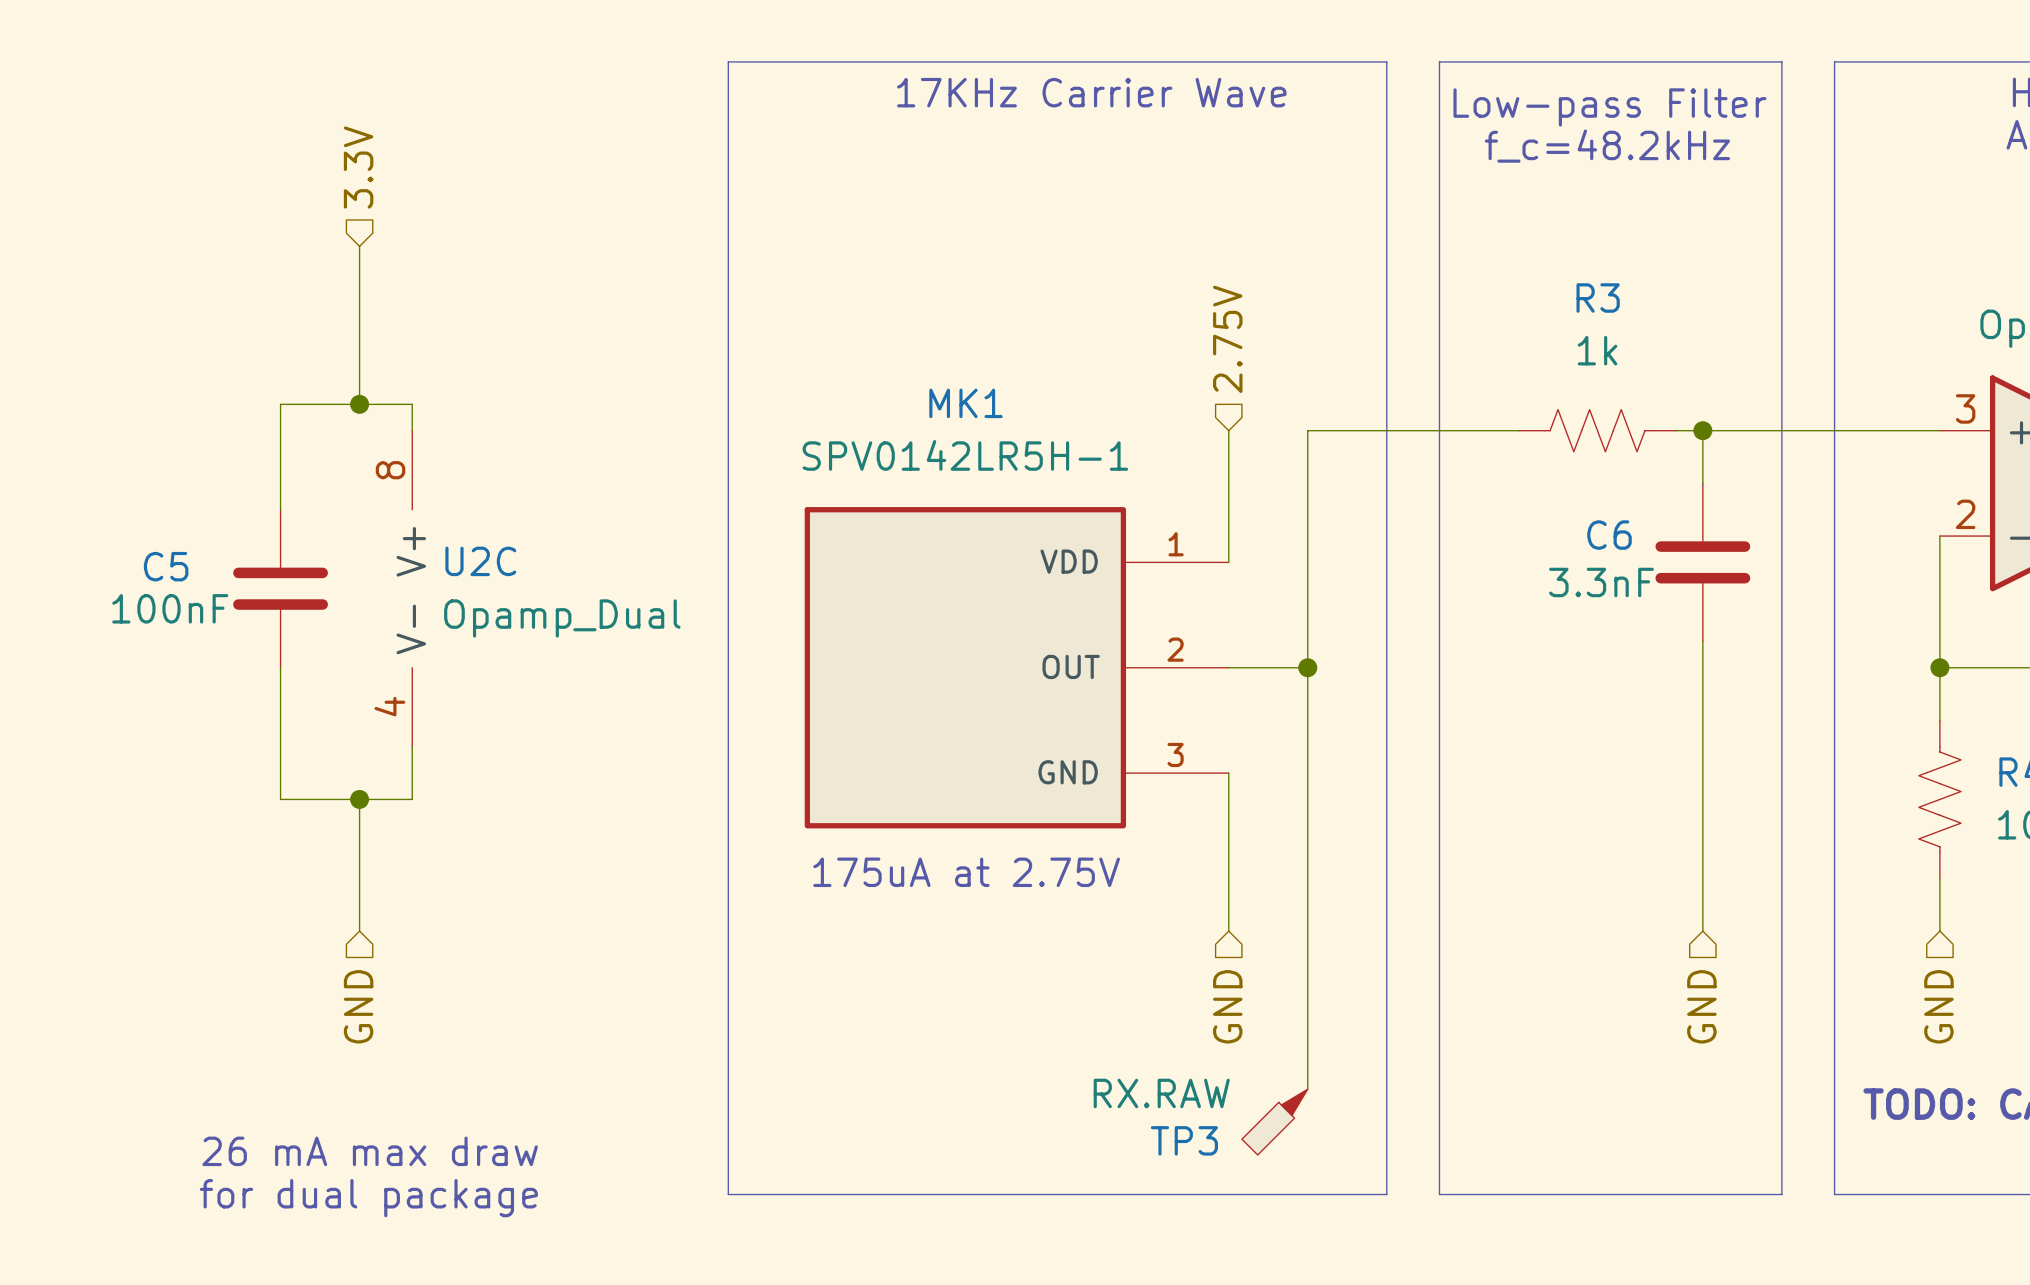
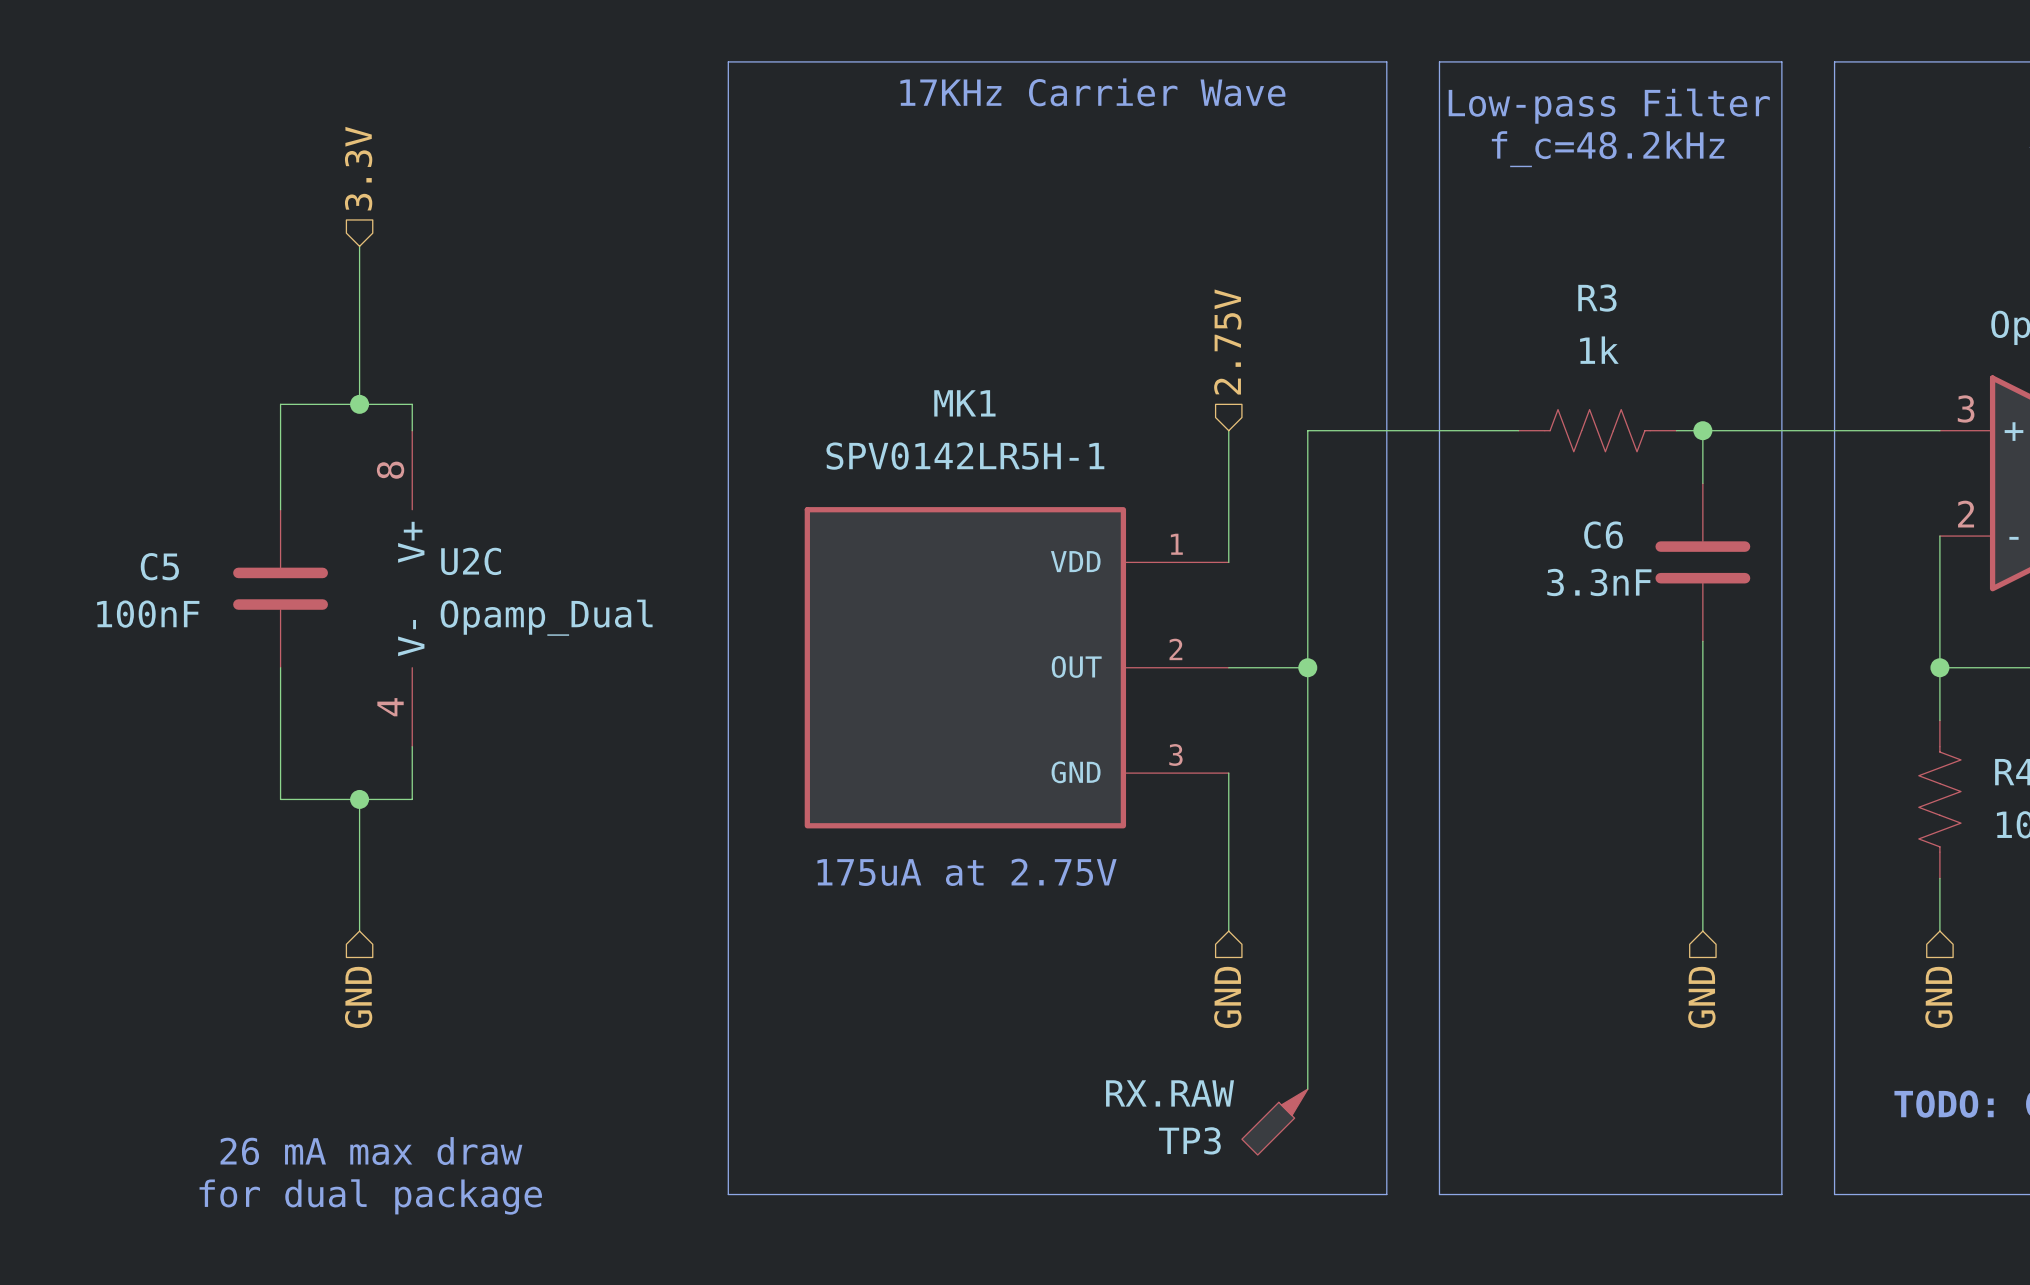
C5 value position: 100nF (170, 608) -> 100nF (148, 614)

